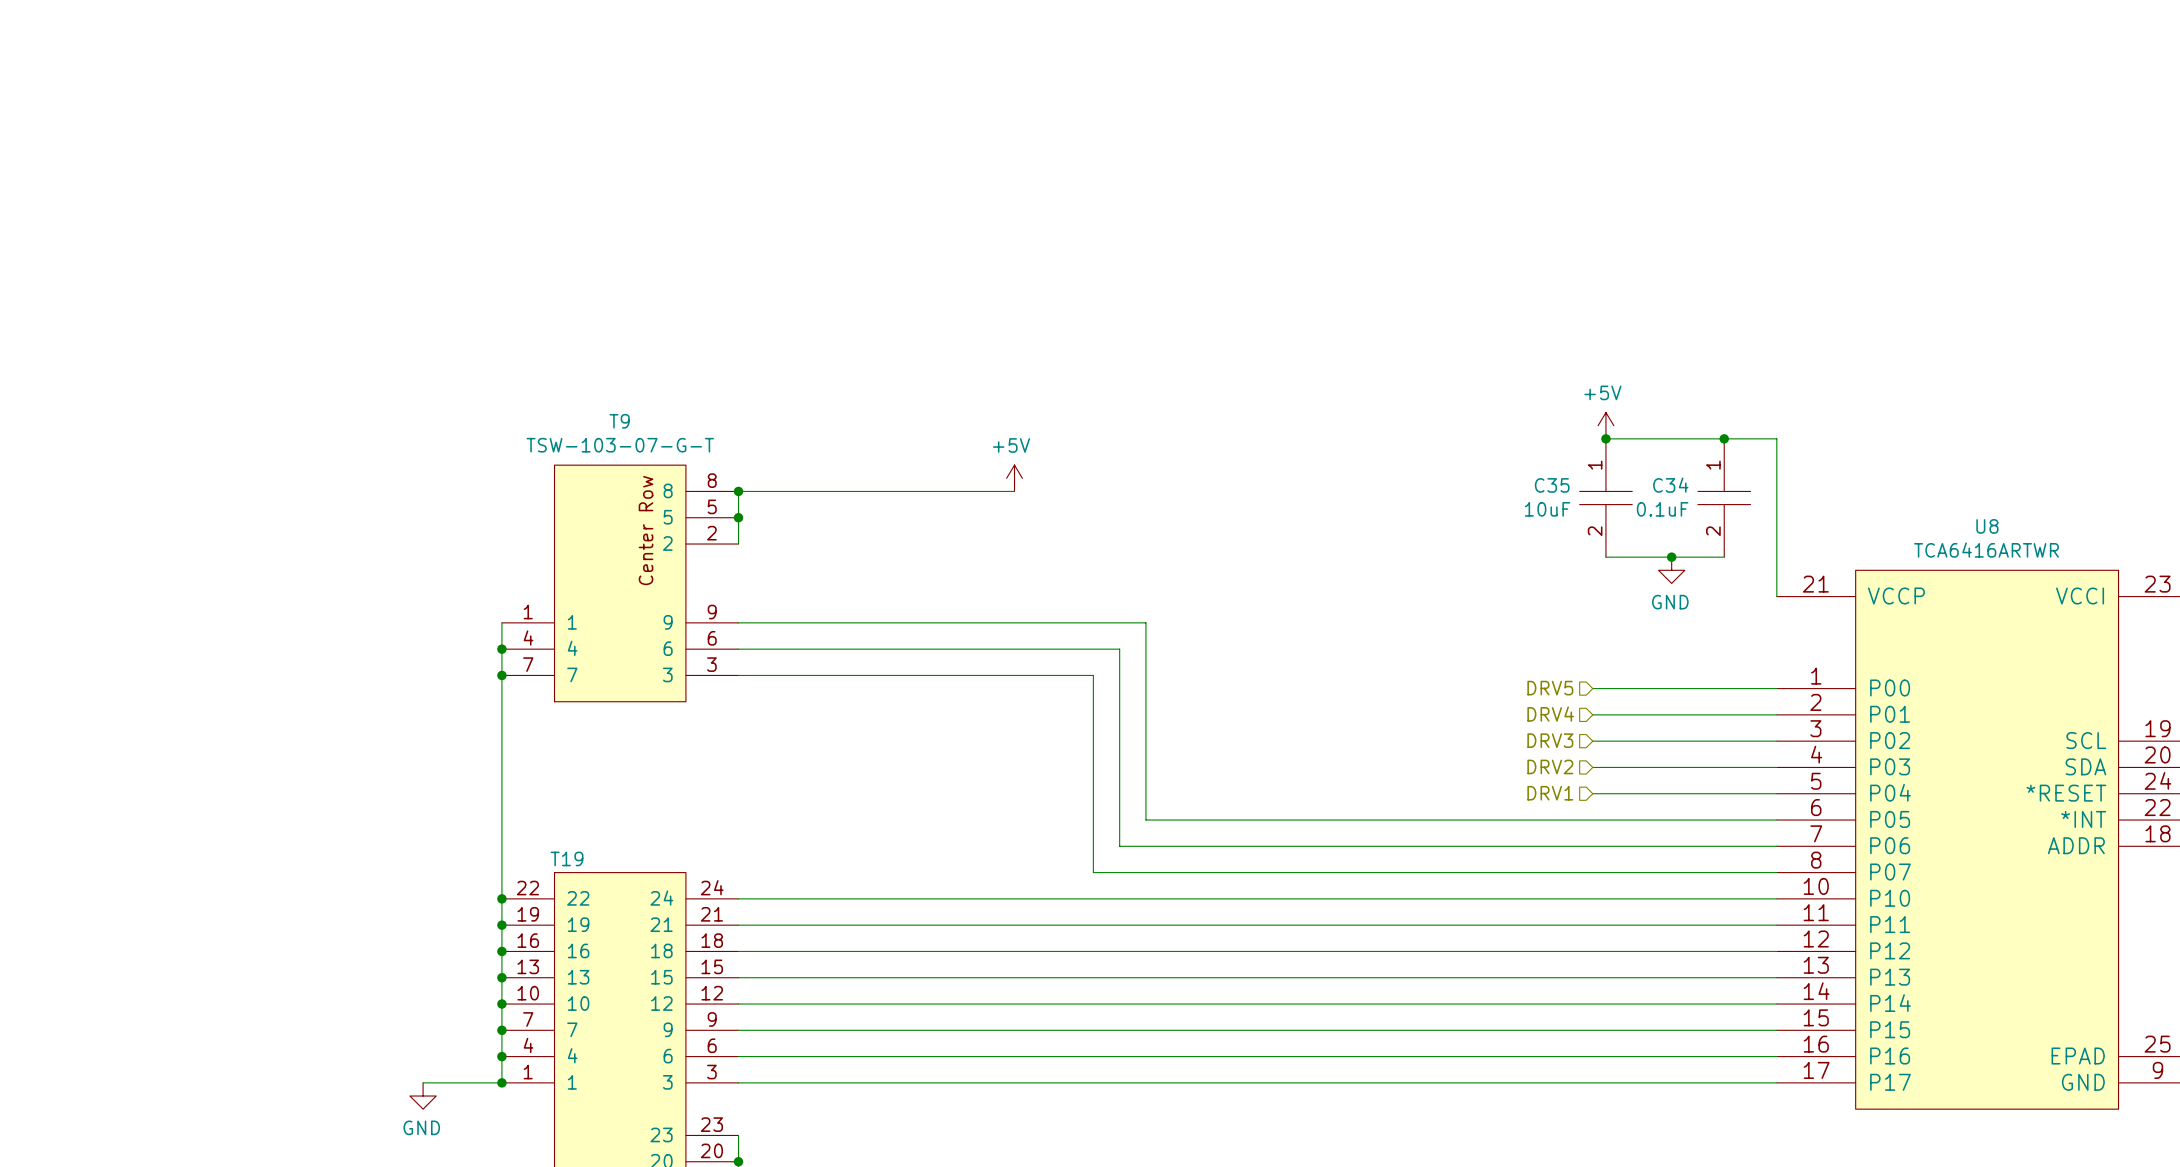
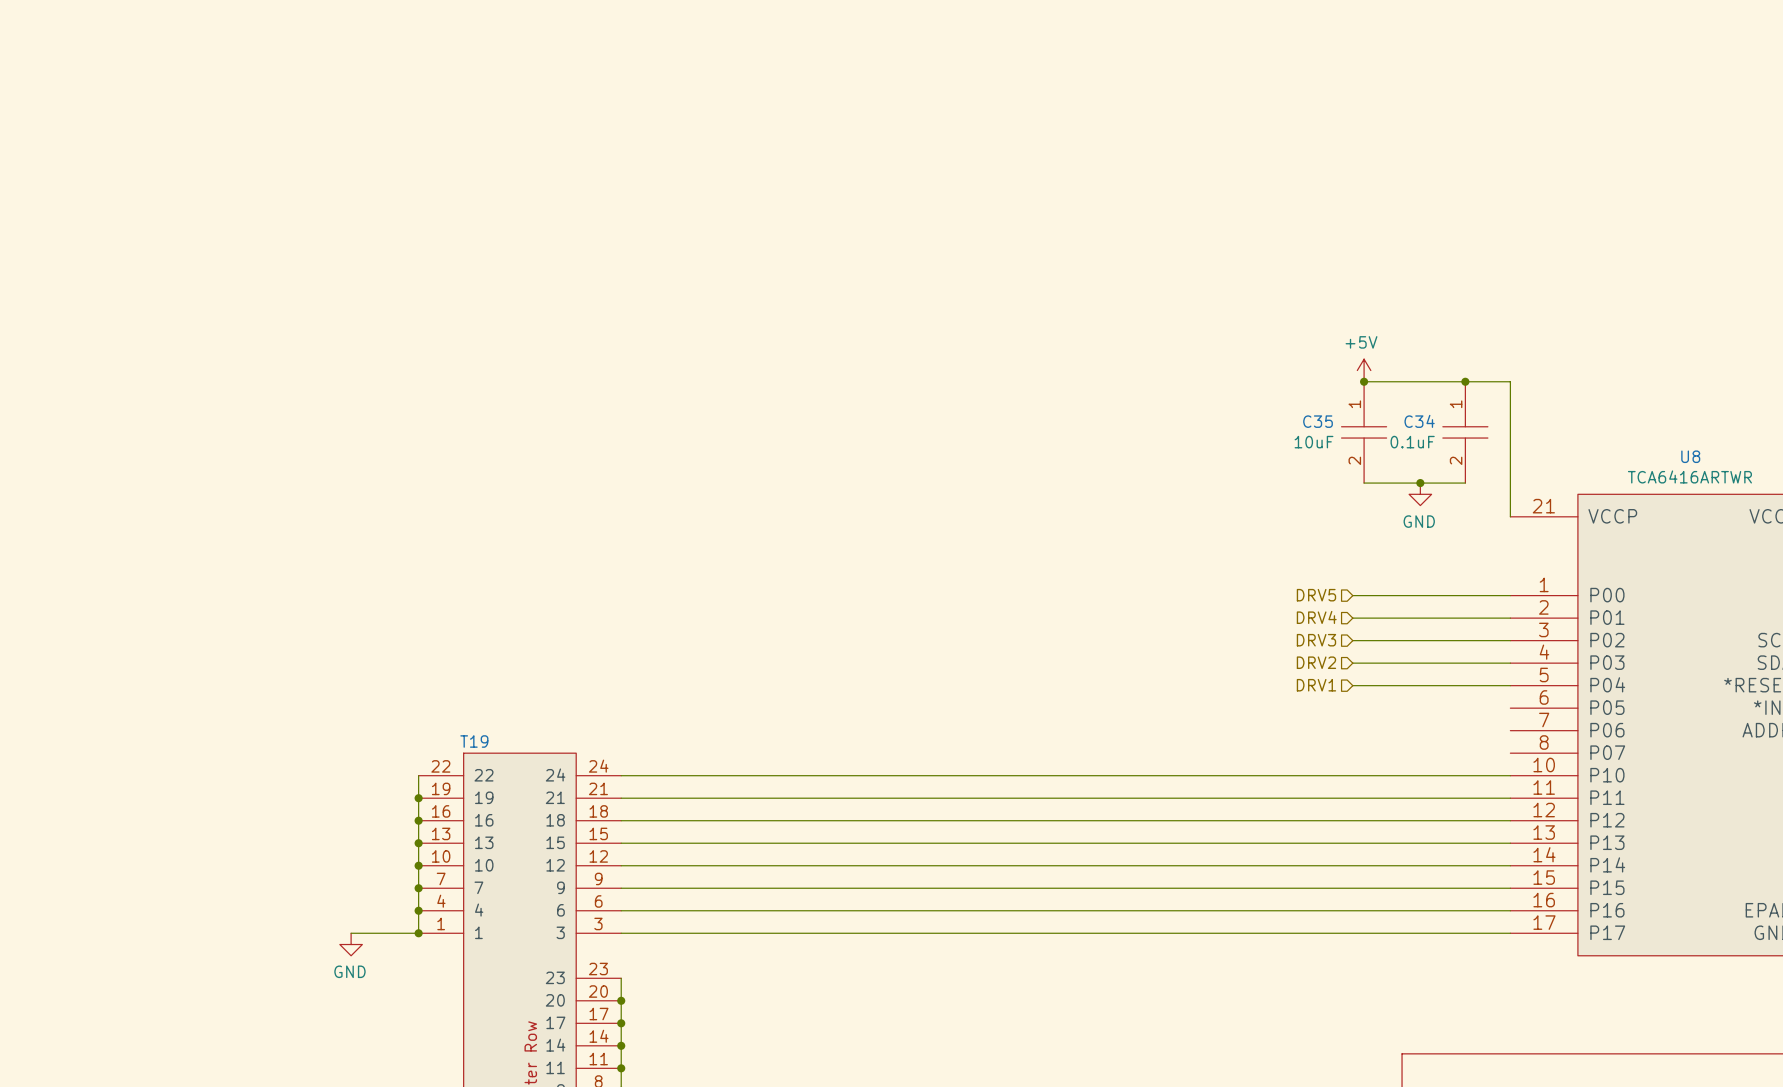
power symbol: +5V (1014, 478) -> none
junction: (738, 491) -> none
wire: (1014, 491) (738, 491) (738, 544) -> none
junction: (738, 517) -> none
T9: TSW-103-07-G-T (620, 583) -> none
wire: (501, 622) (501, 898) -> none
wire: (738, 622) (1145, 622) (1145, 820) (1776, 820) -> none
junction: (501, 649) -> none
wire: (738, 649) (1119, 649) (1119, 846) (1776, 846) -> none
junction: (501, 675) -> none
wire: (738, 675) (1093, 675) (1093, 872) (1776, 872) -> none
junction: (501, 898) -> none

